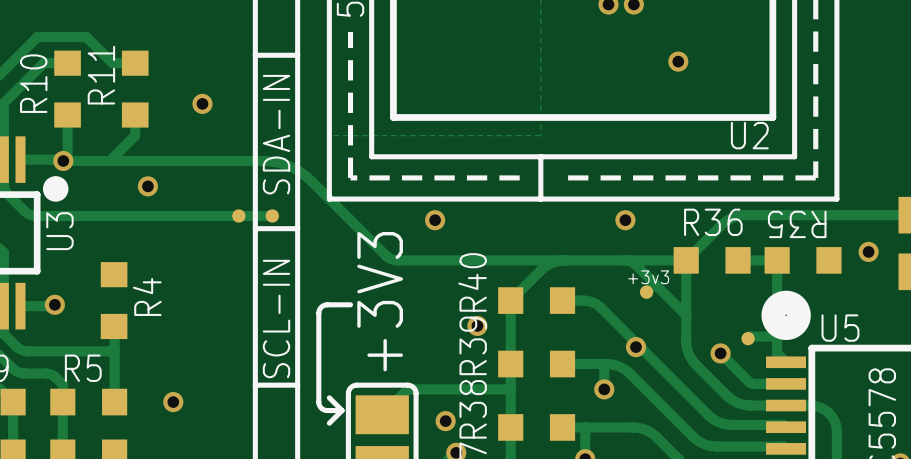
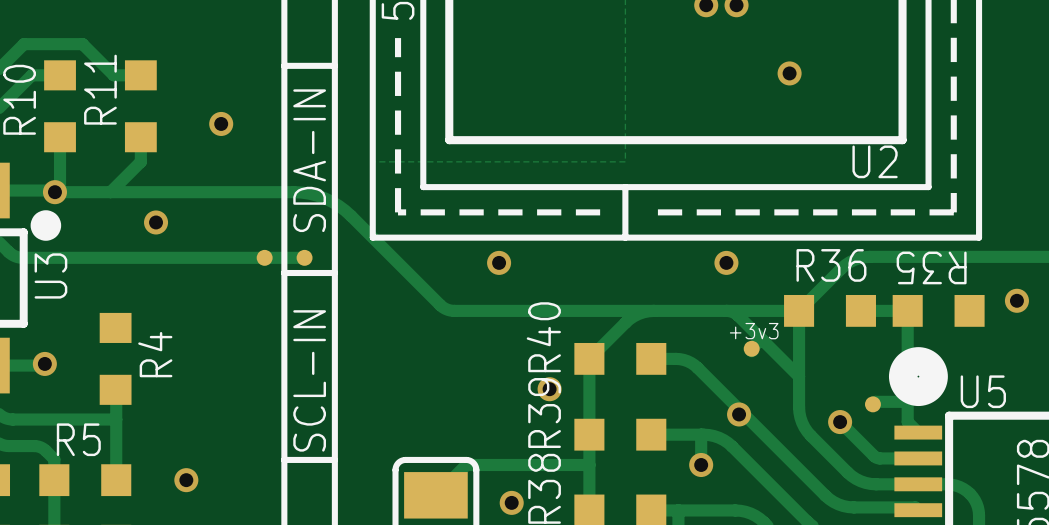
text: +3V3 (380, 301) -> none
line: (350, 304) (325, 305) (318, 312) (319, 404) (325, 410) (339, 410) -> none
line: (329, 397) (342, 410) (329, 423) -> none

